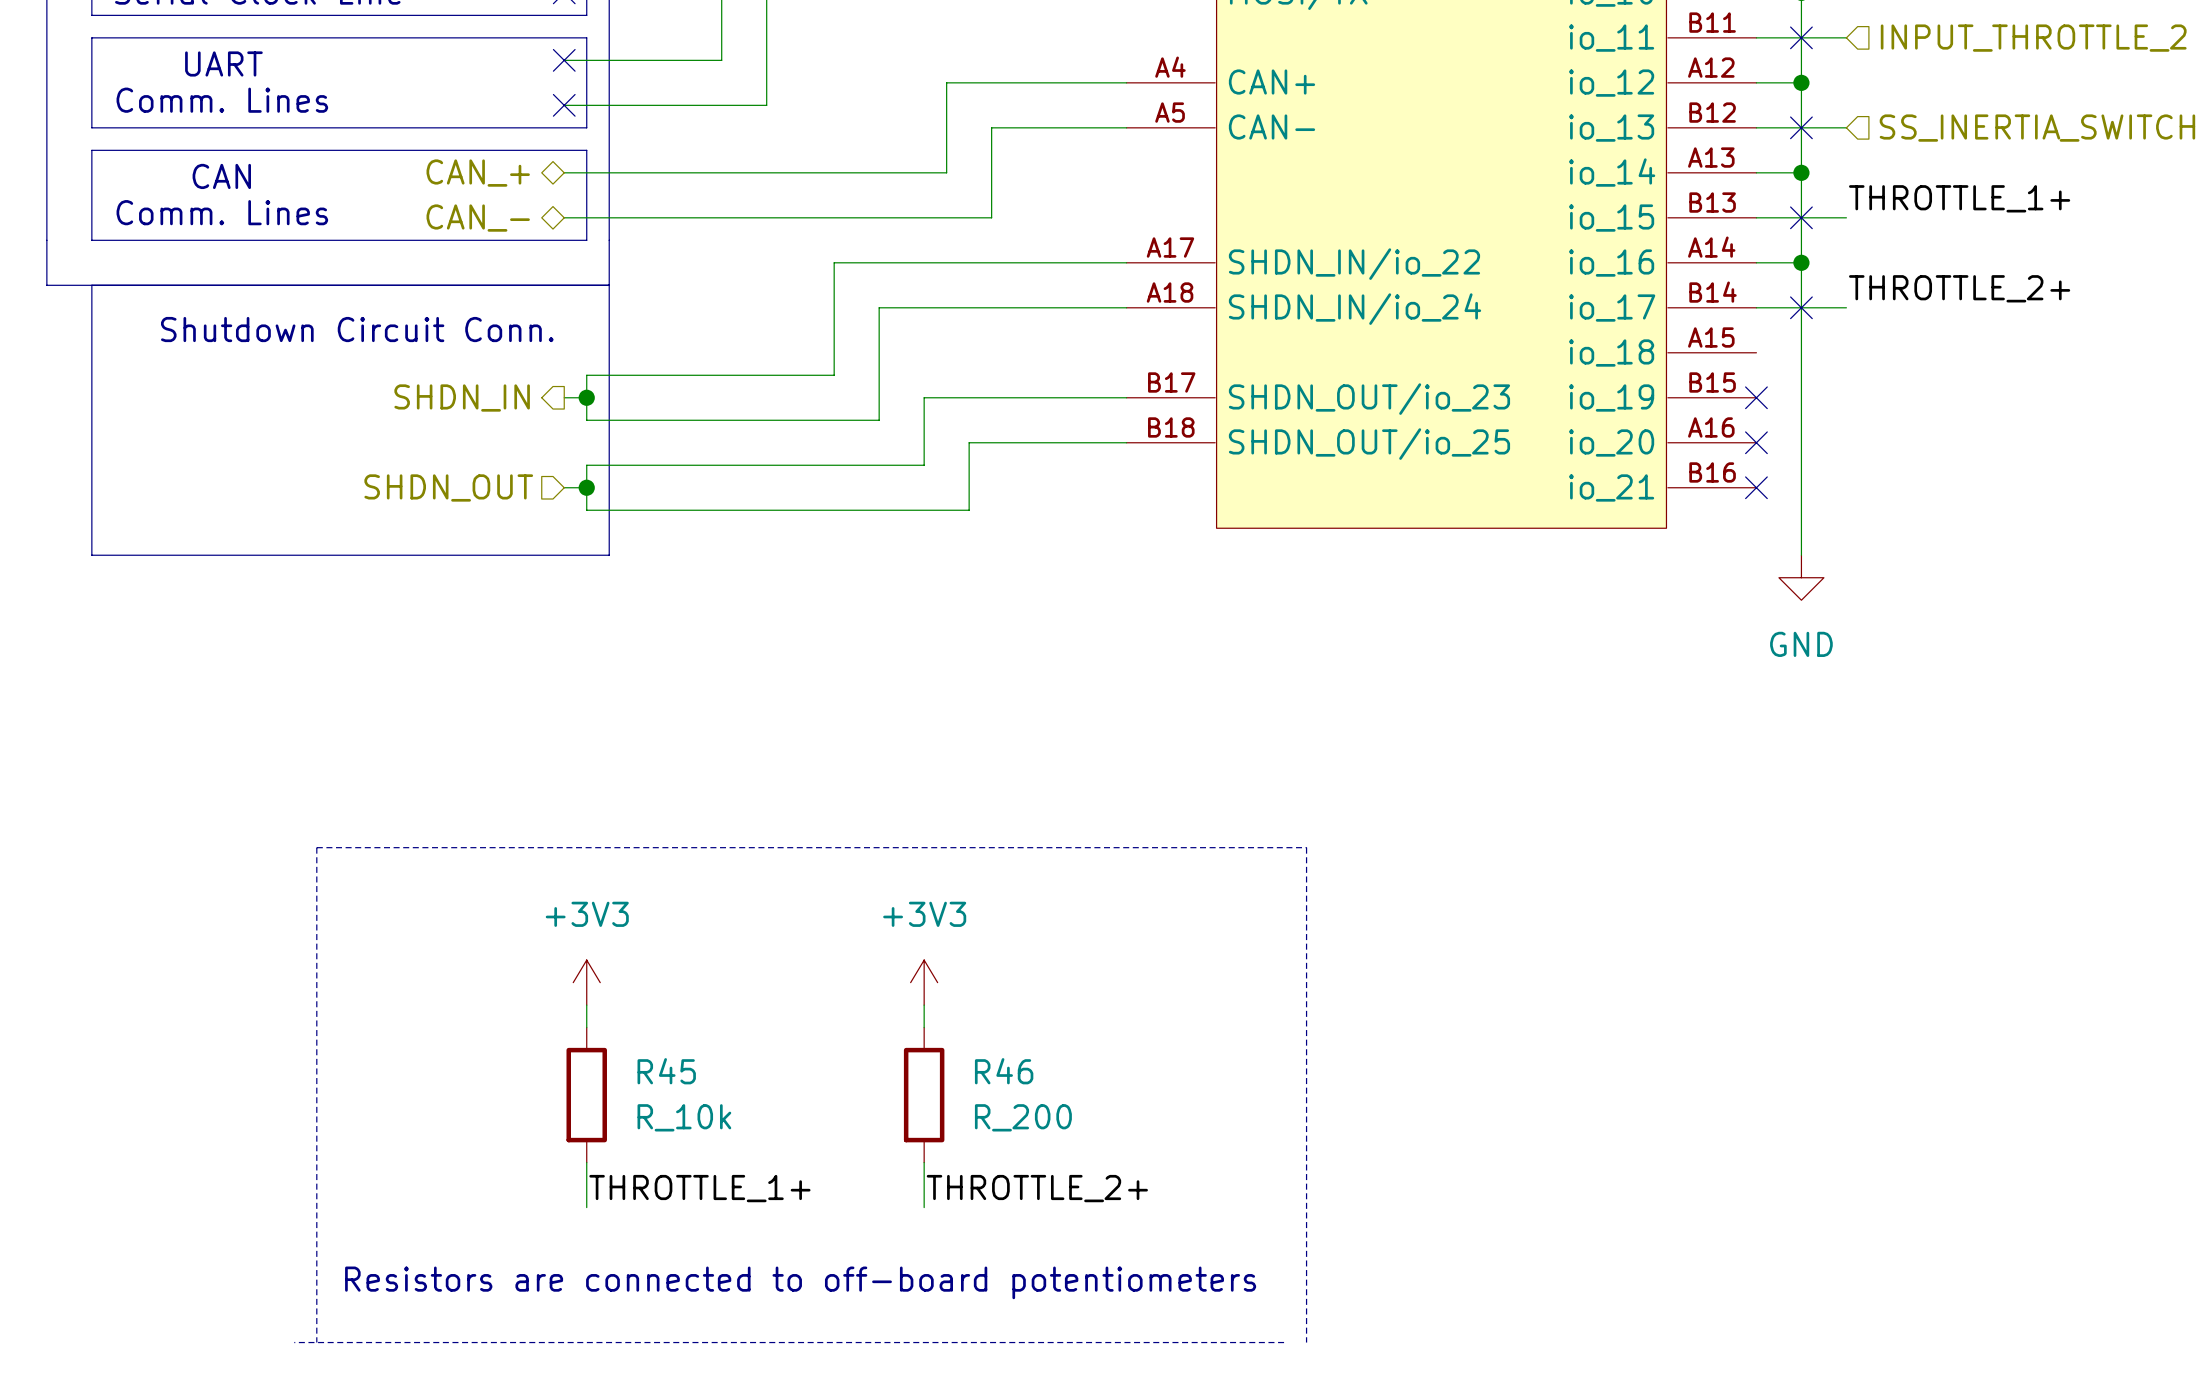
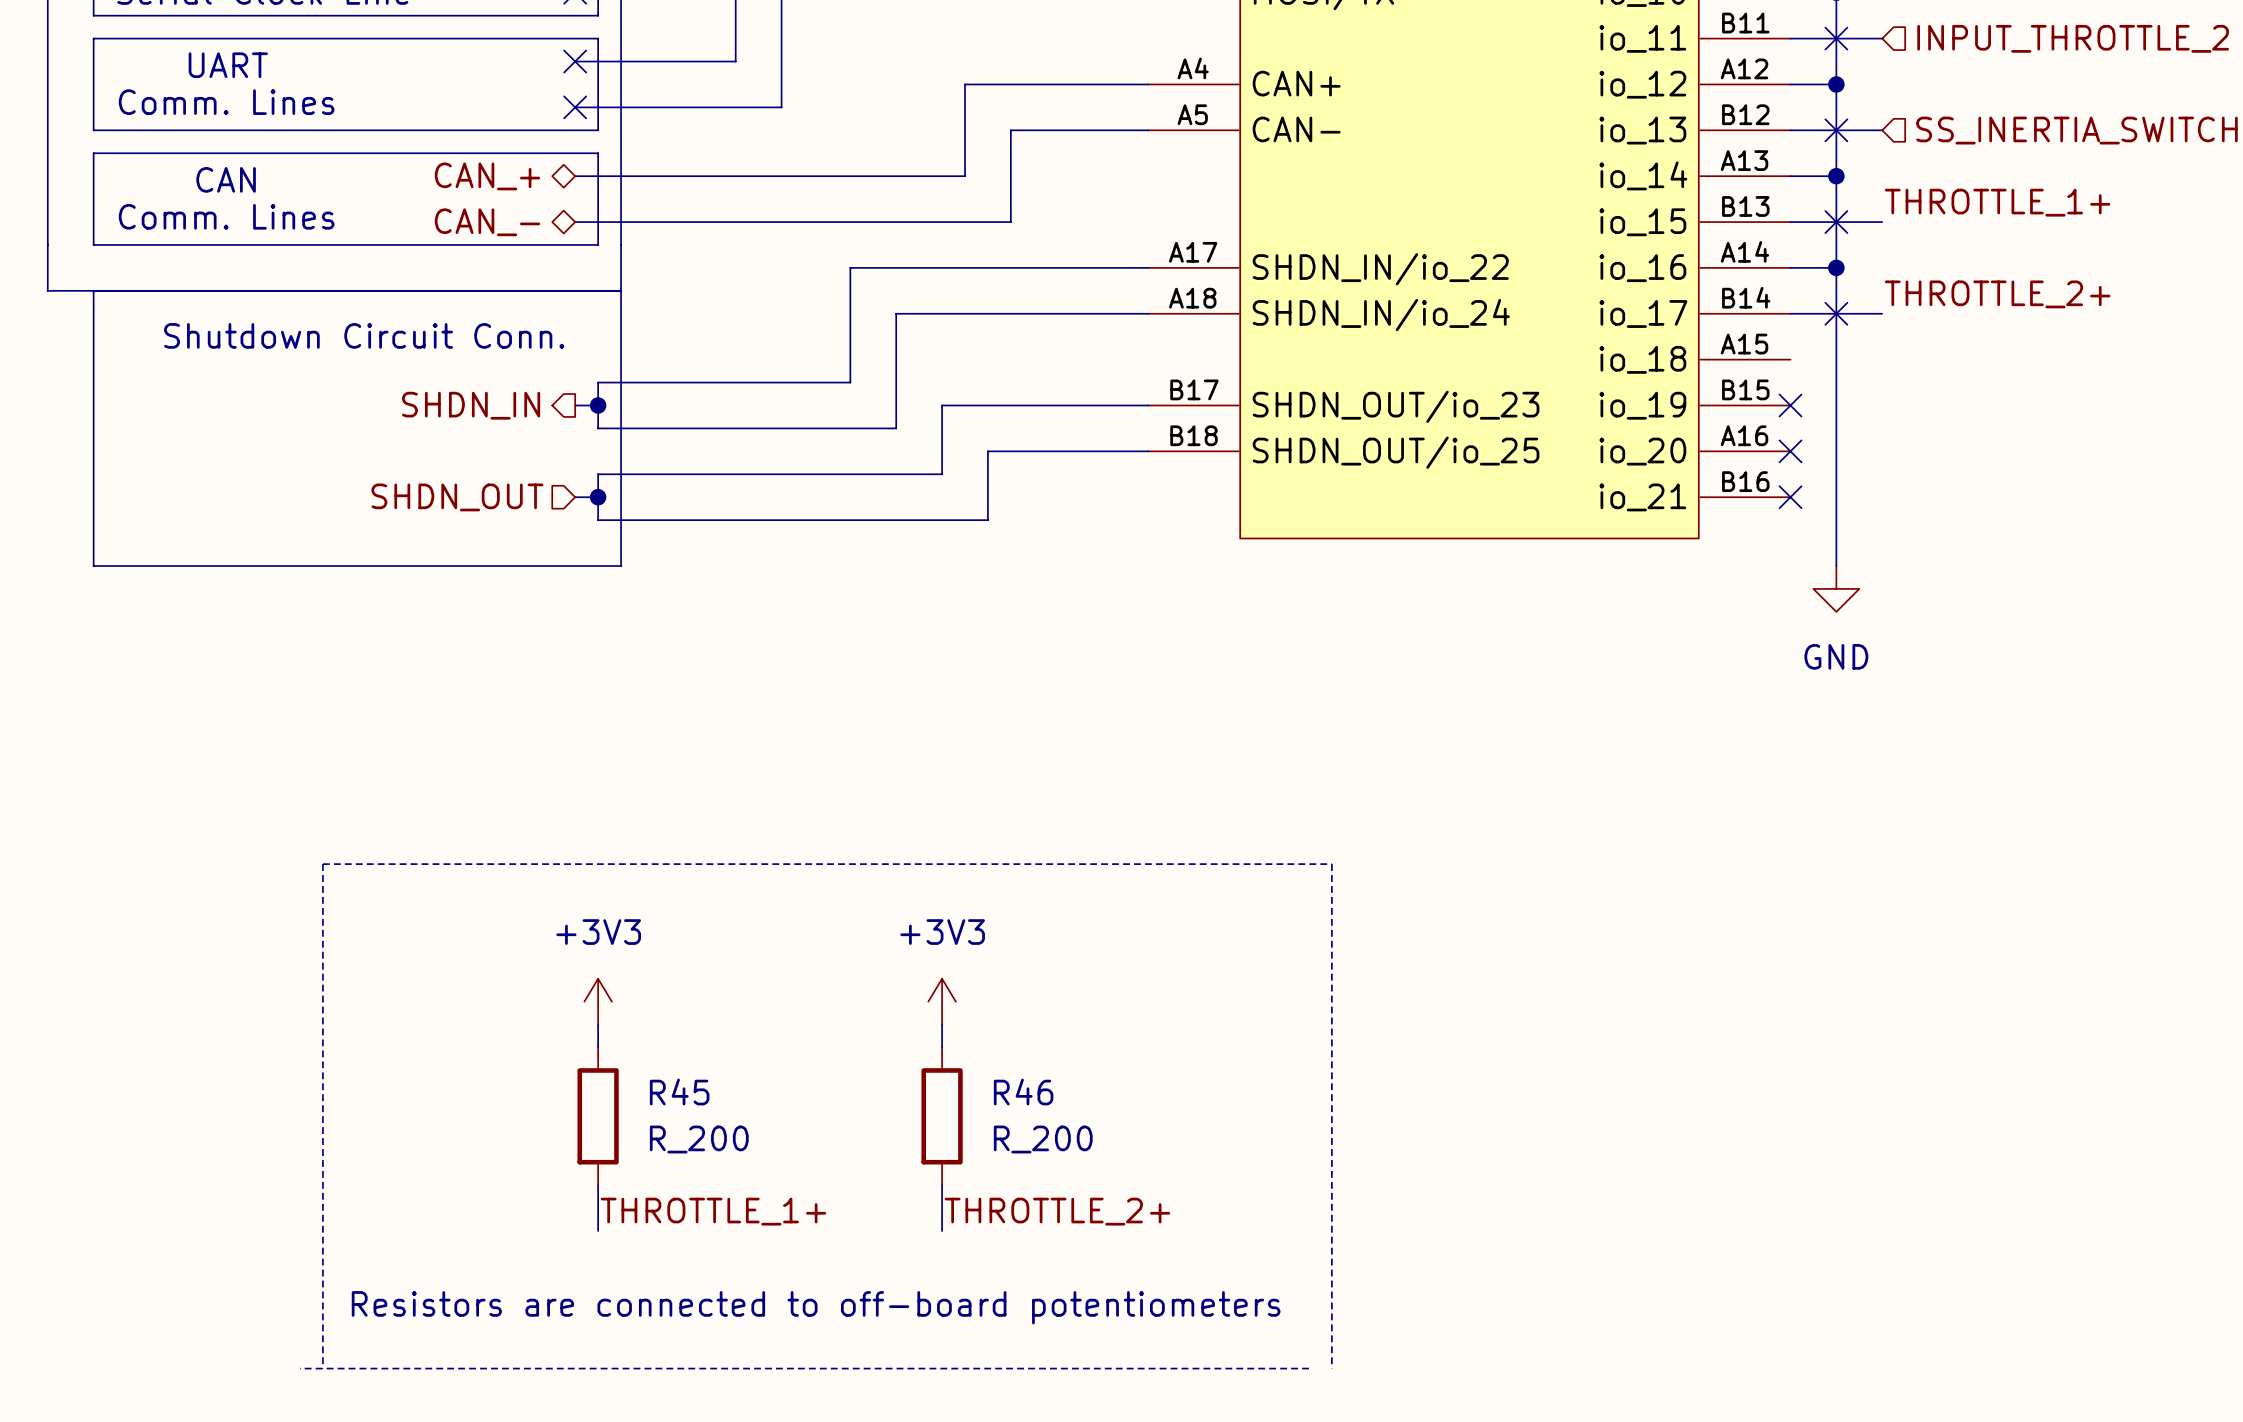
R45 value: R_10k (684, 1117) -> R_200 (699, 1139)

